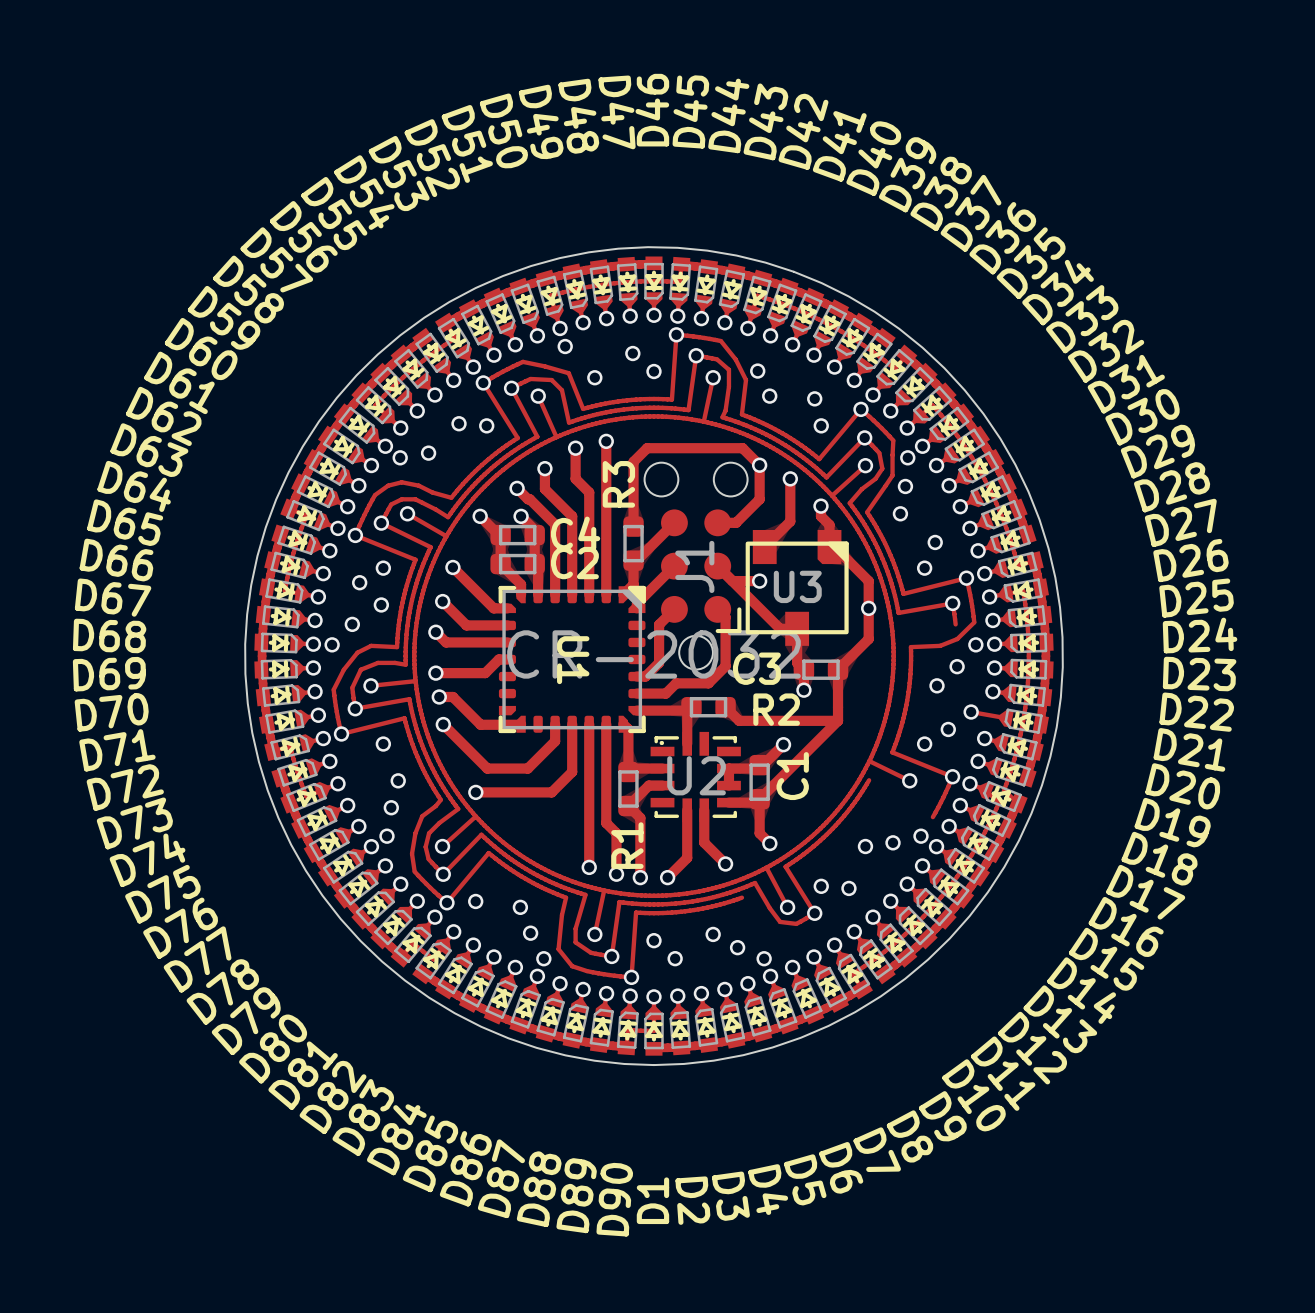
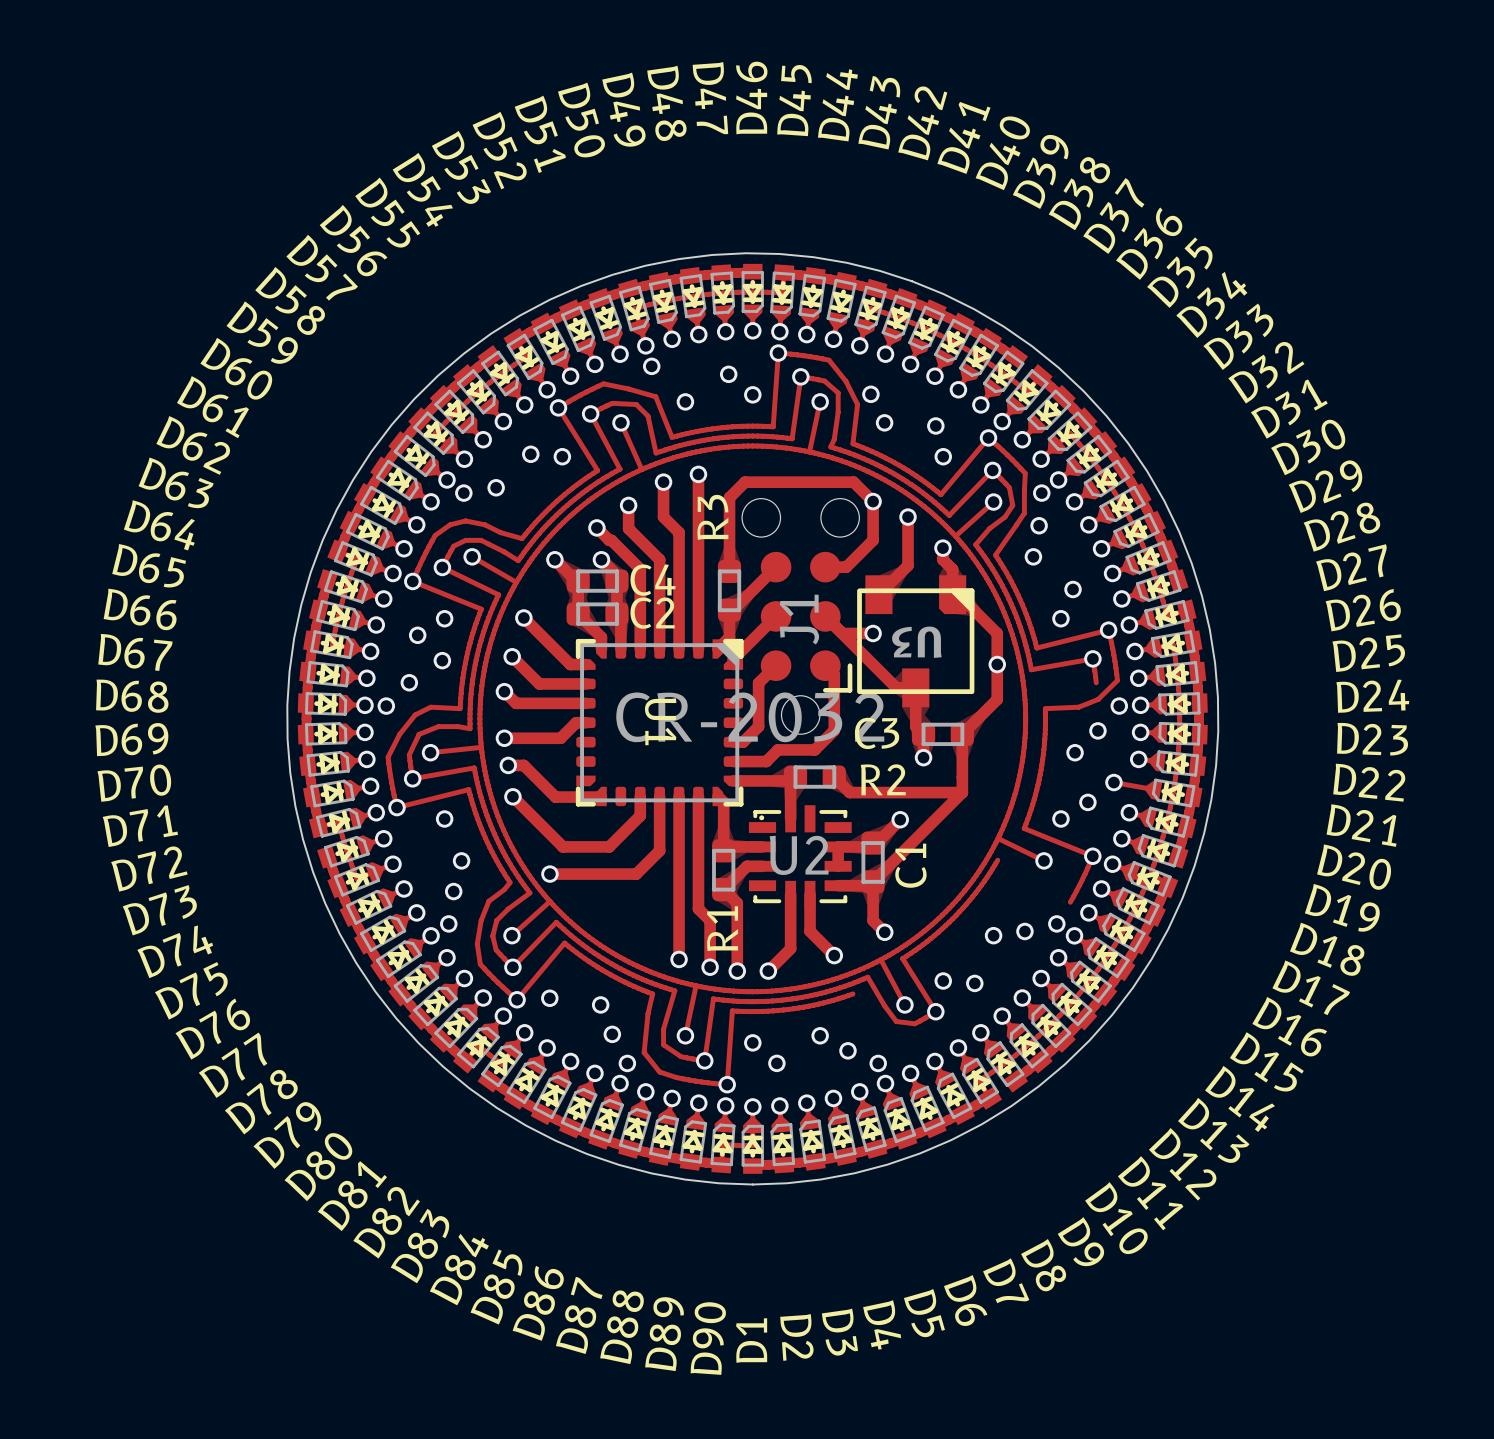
U3 name rotation: 0° (797, 586) -> 180° (916, 642)

